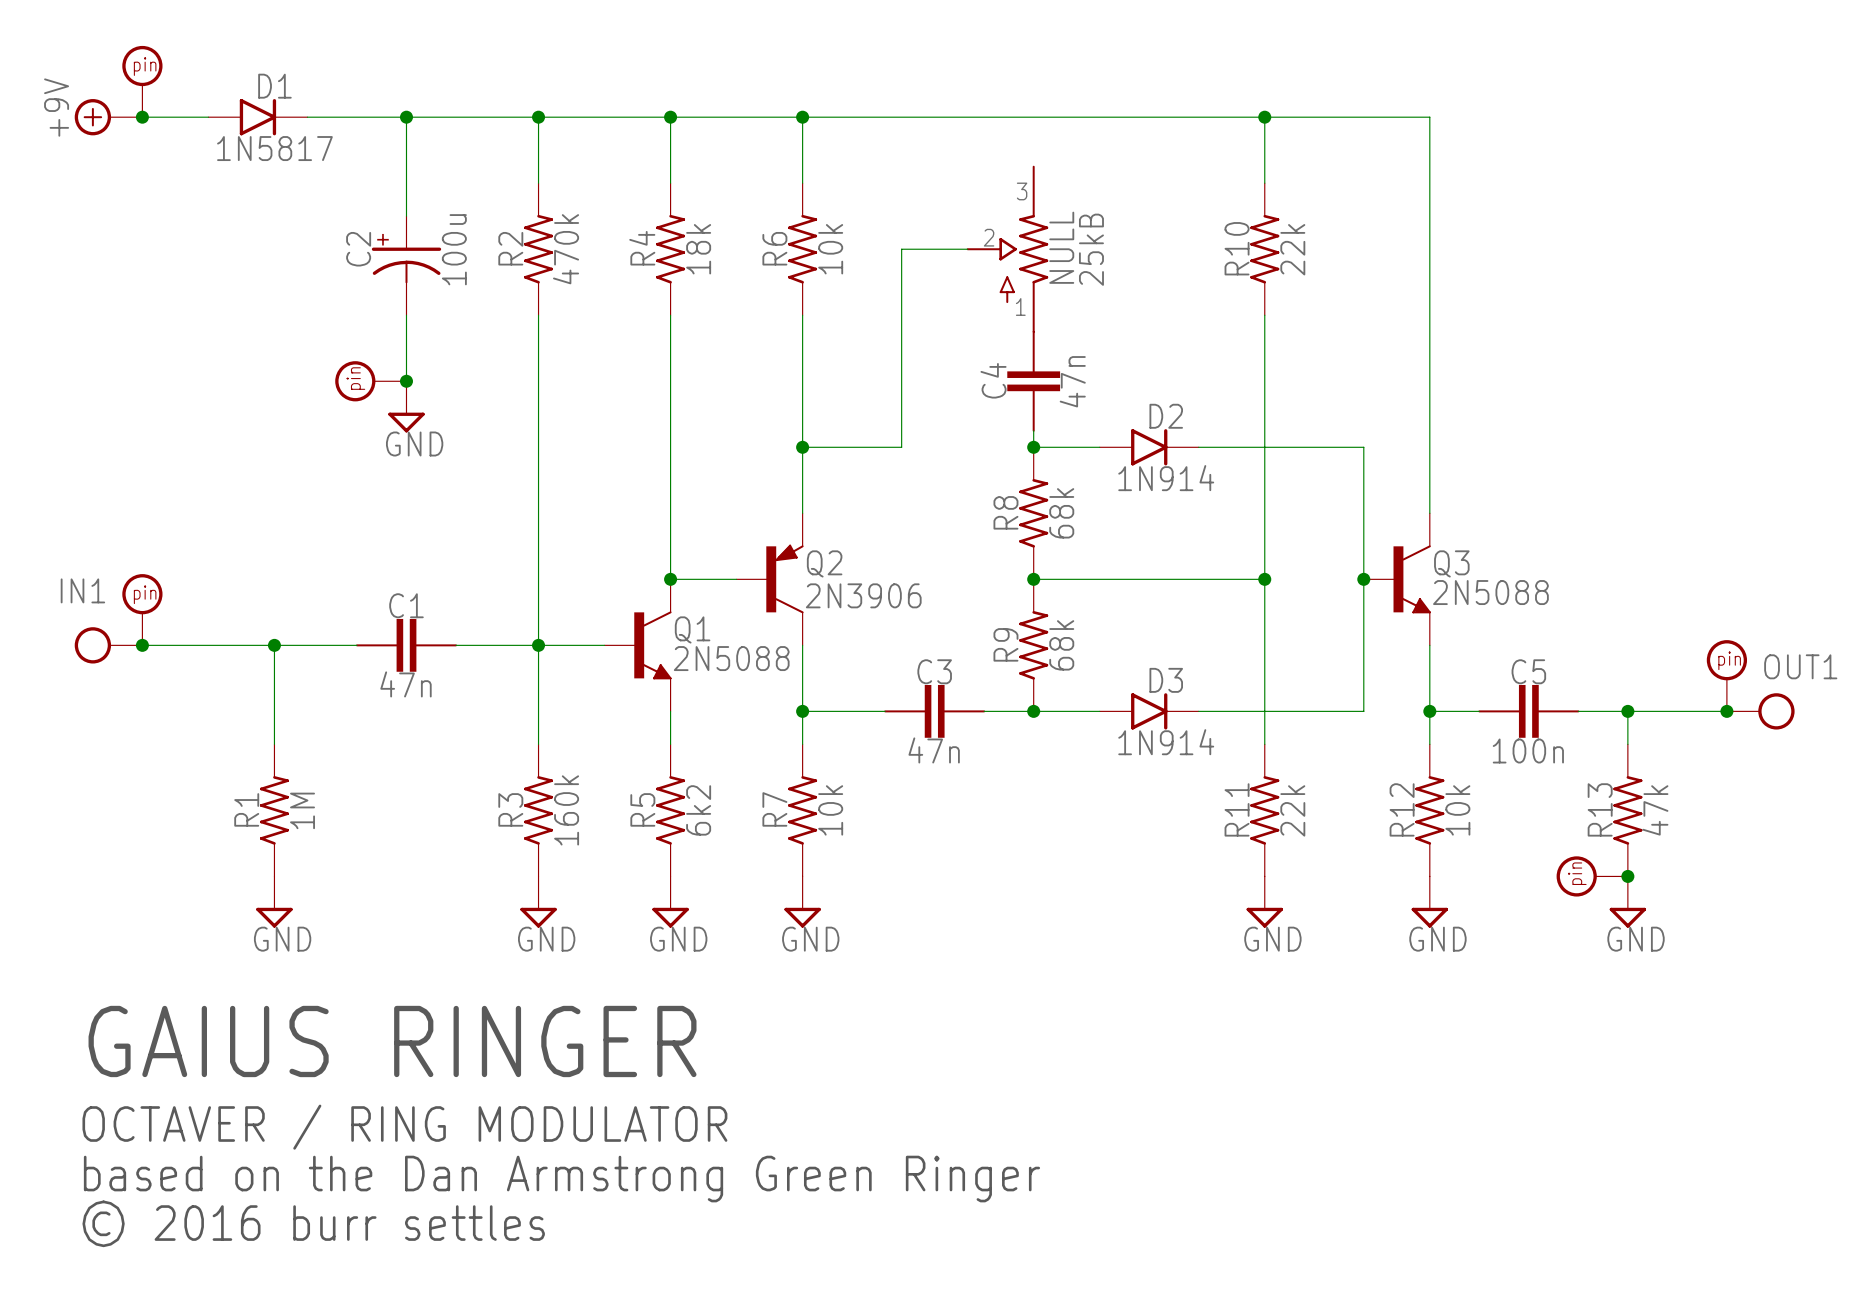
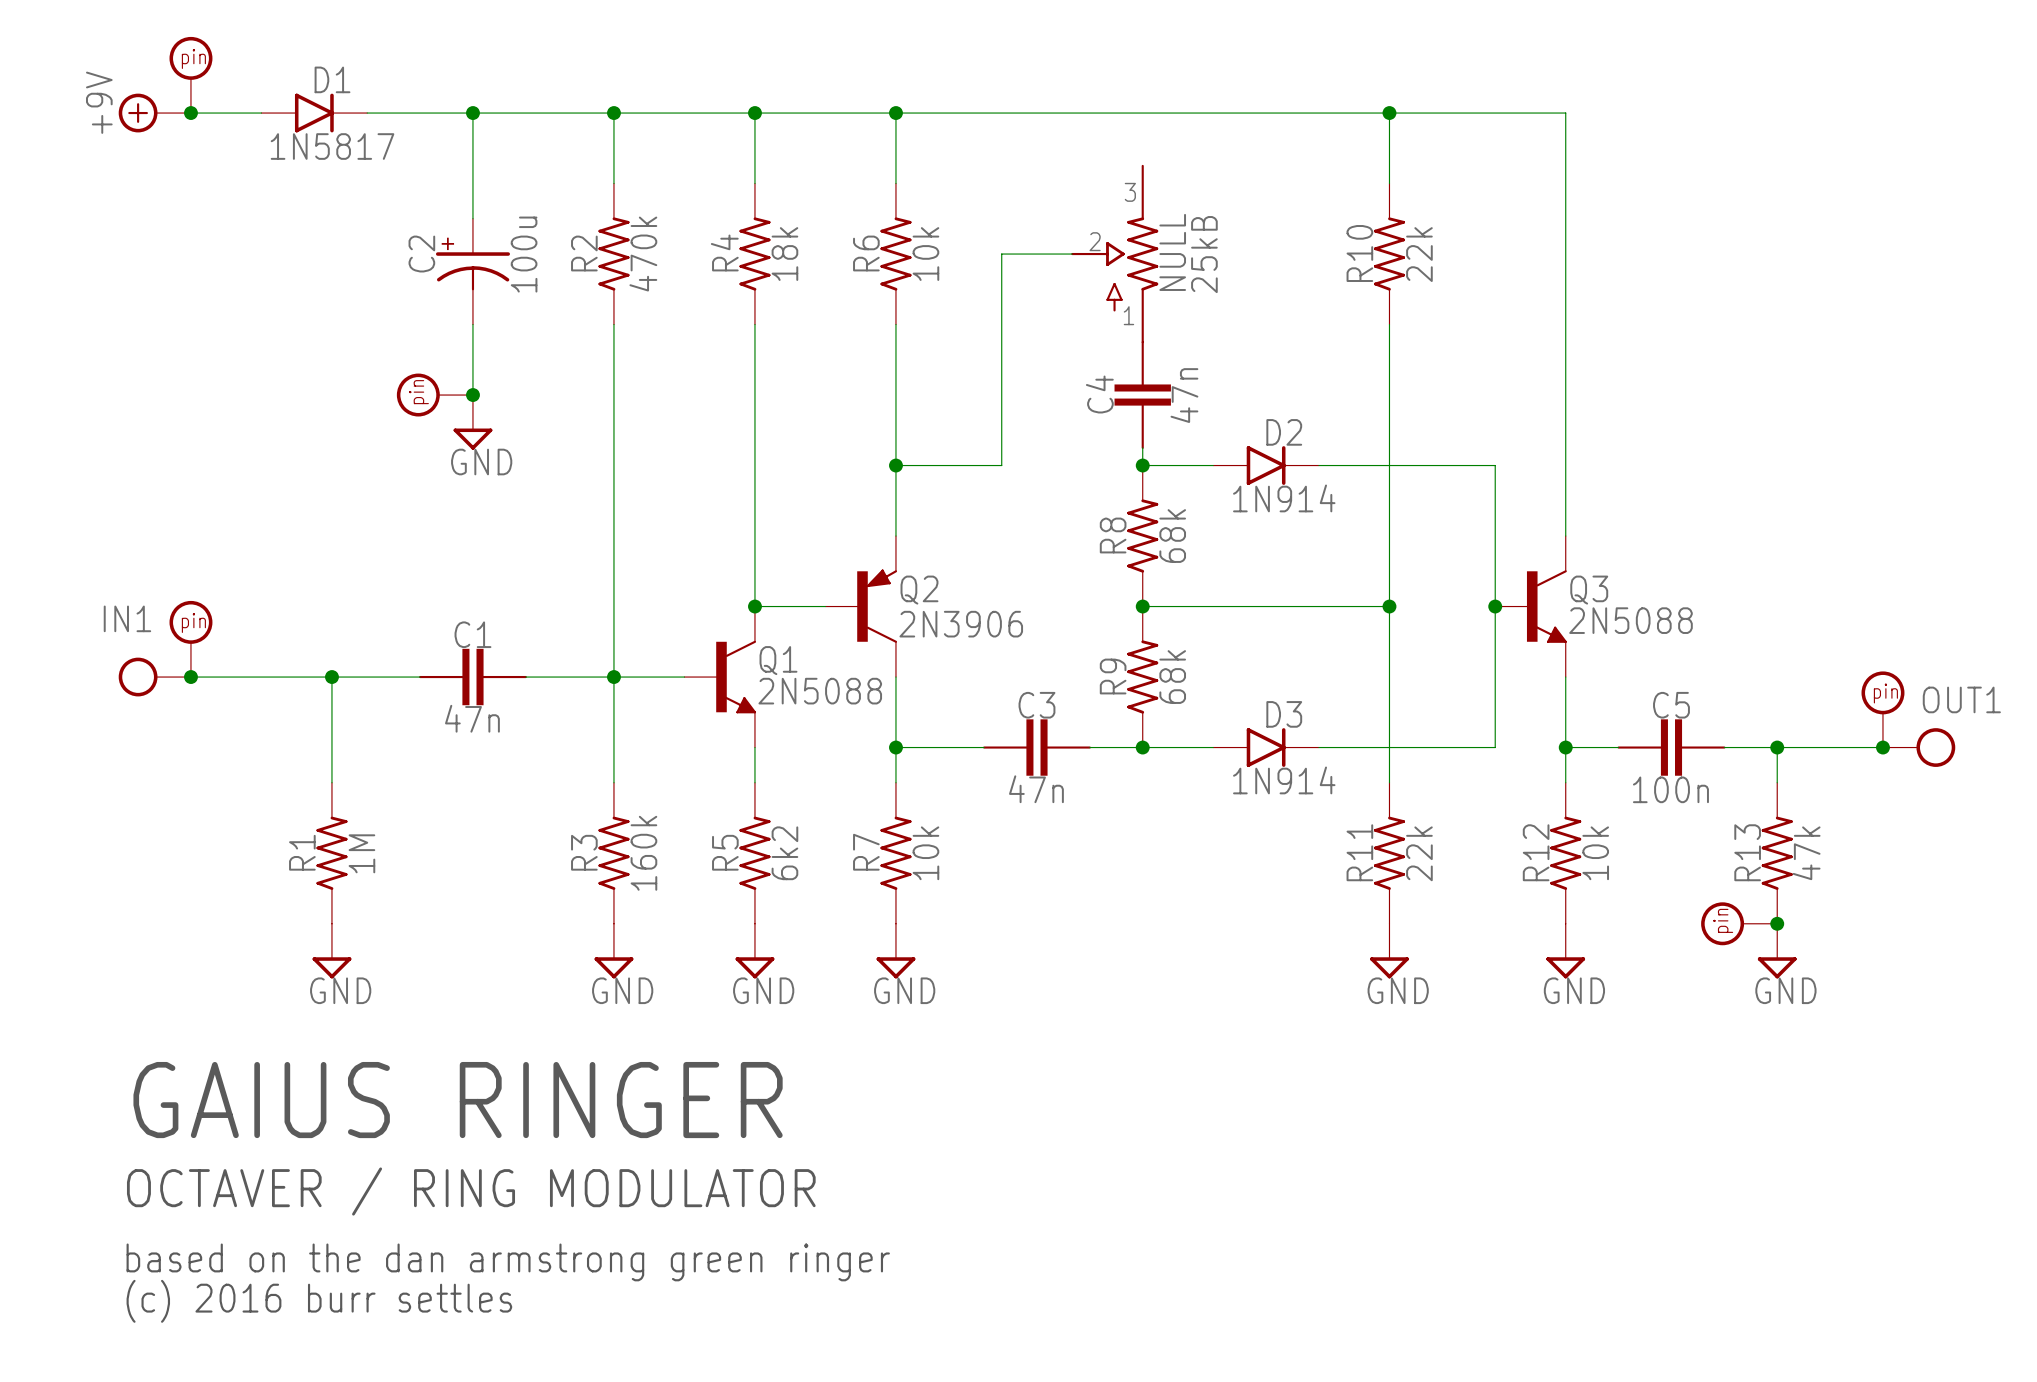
text: based on the Dan Armstrong Green Ringer (561, 1179) -> based on the dan armstrong green ringer (508, 1262)
text: © 2016 burr settles (313, 1223) -> (c) 2016 burr settles (319, 1301)

